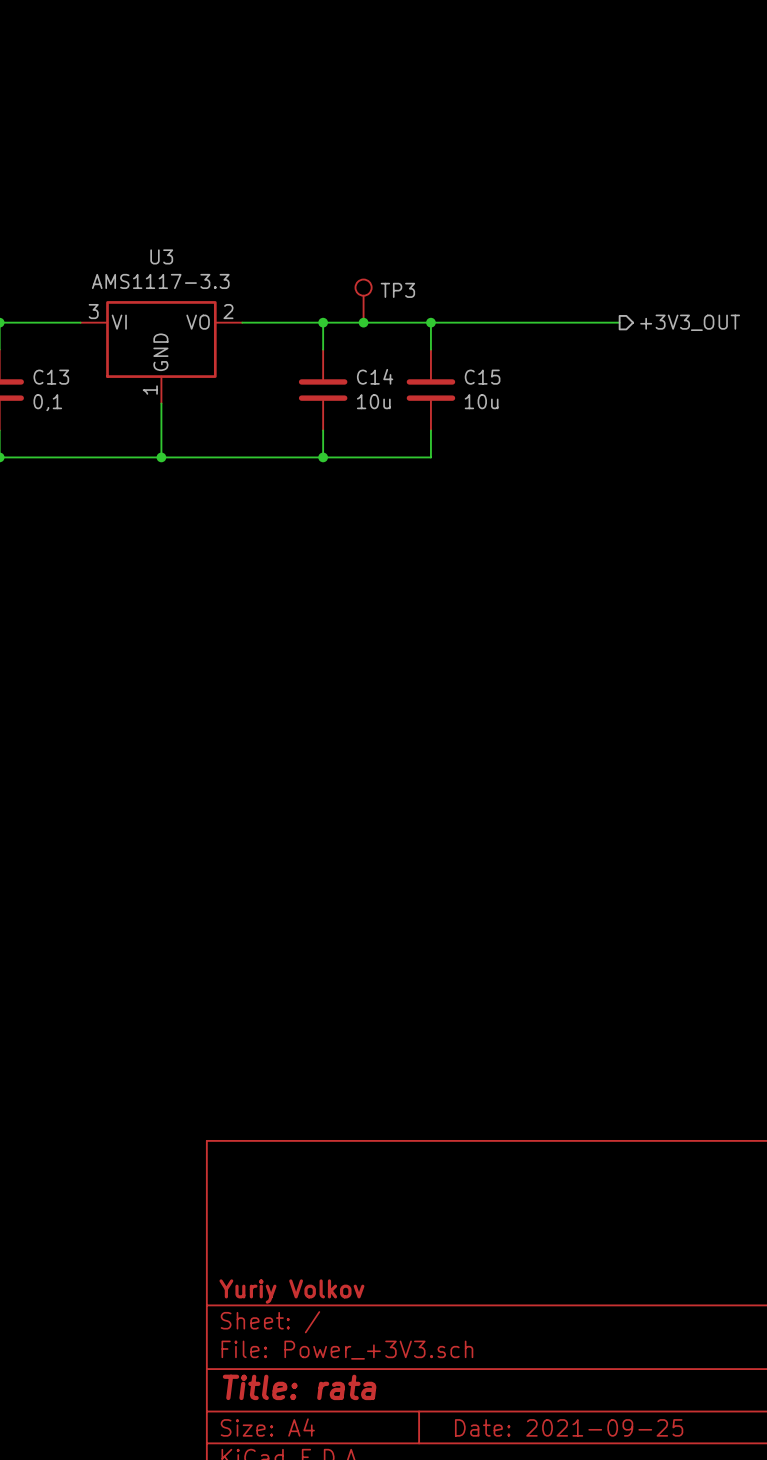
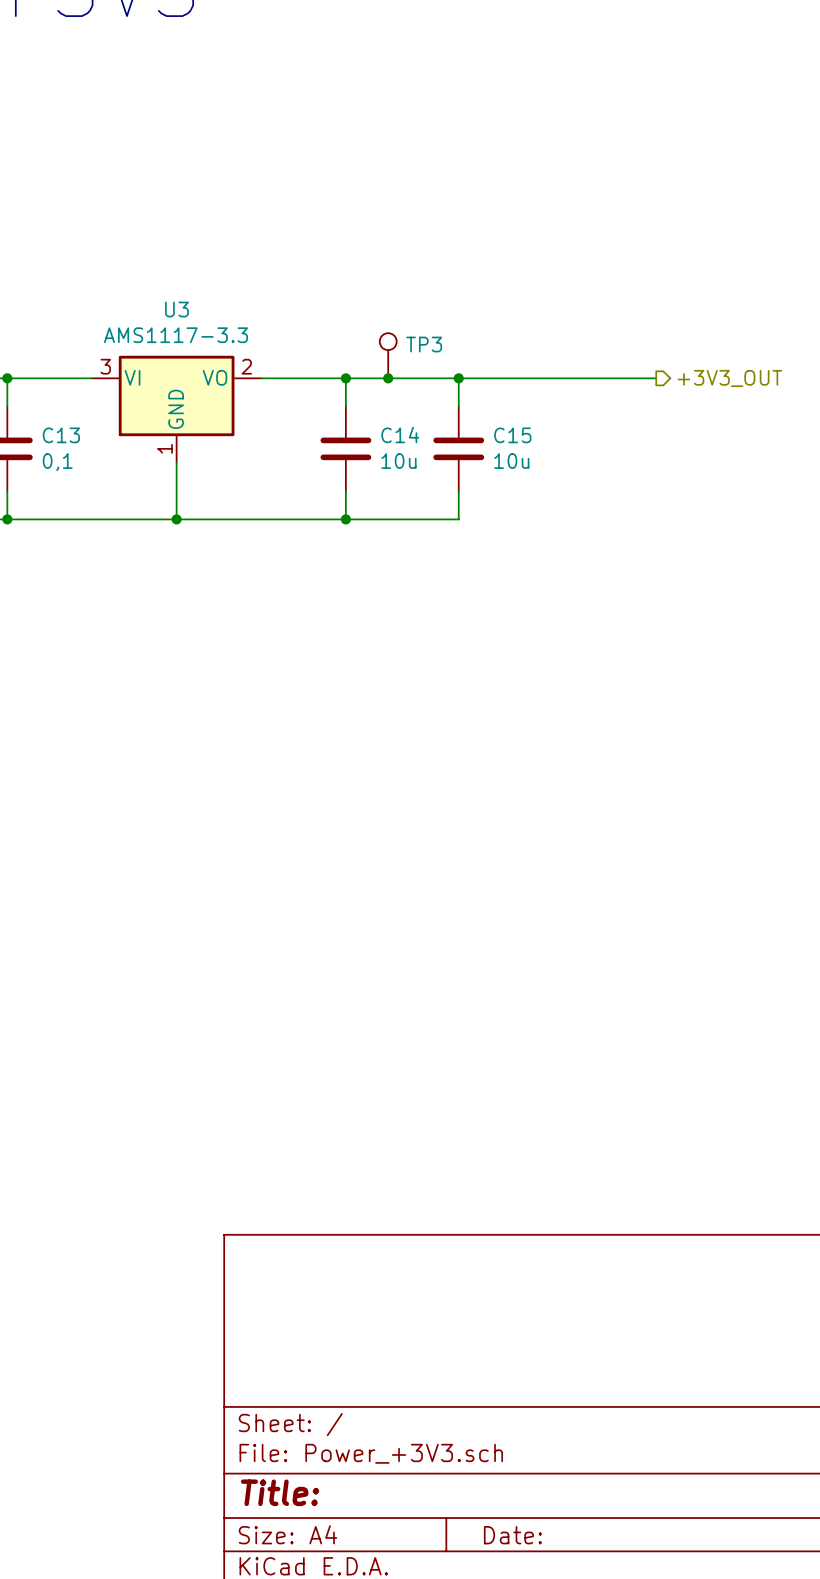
title block: Yuriy Volkov (291, 1291) -> none
title block: Title: rata (299, 1387) -> Title: (280, 1492)
title block: Date: 2021-09-25 (569, 1427) -> Date: (512, 1535)

